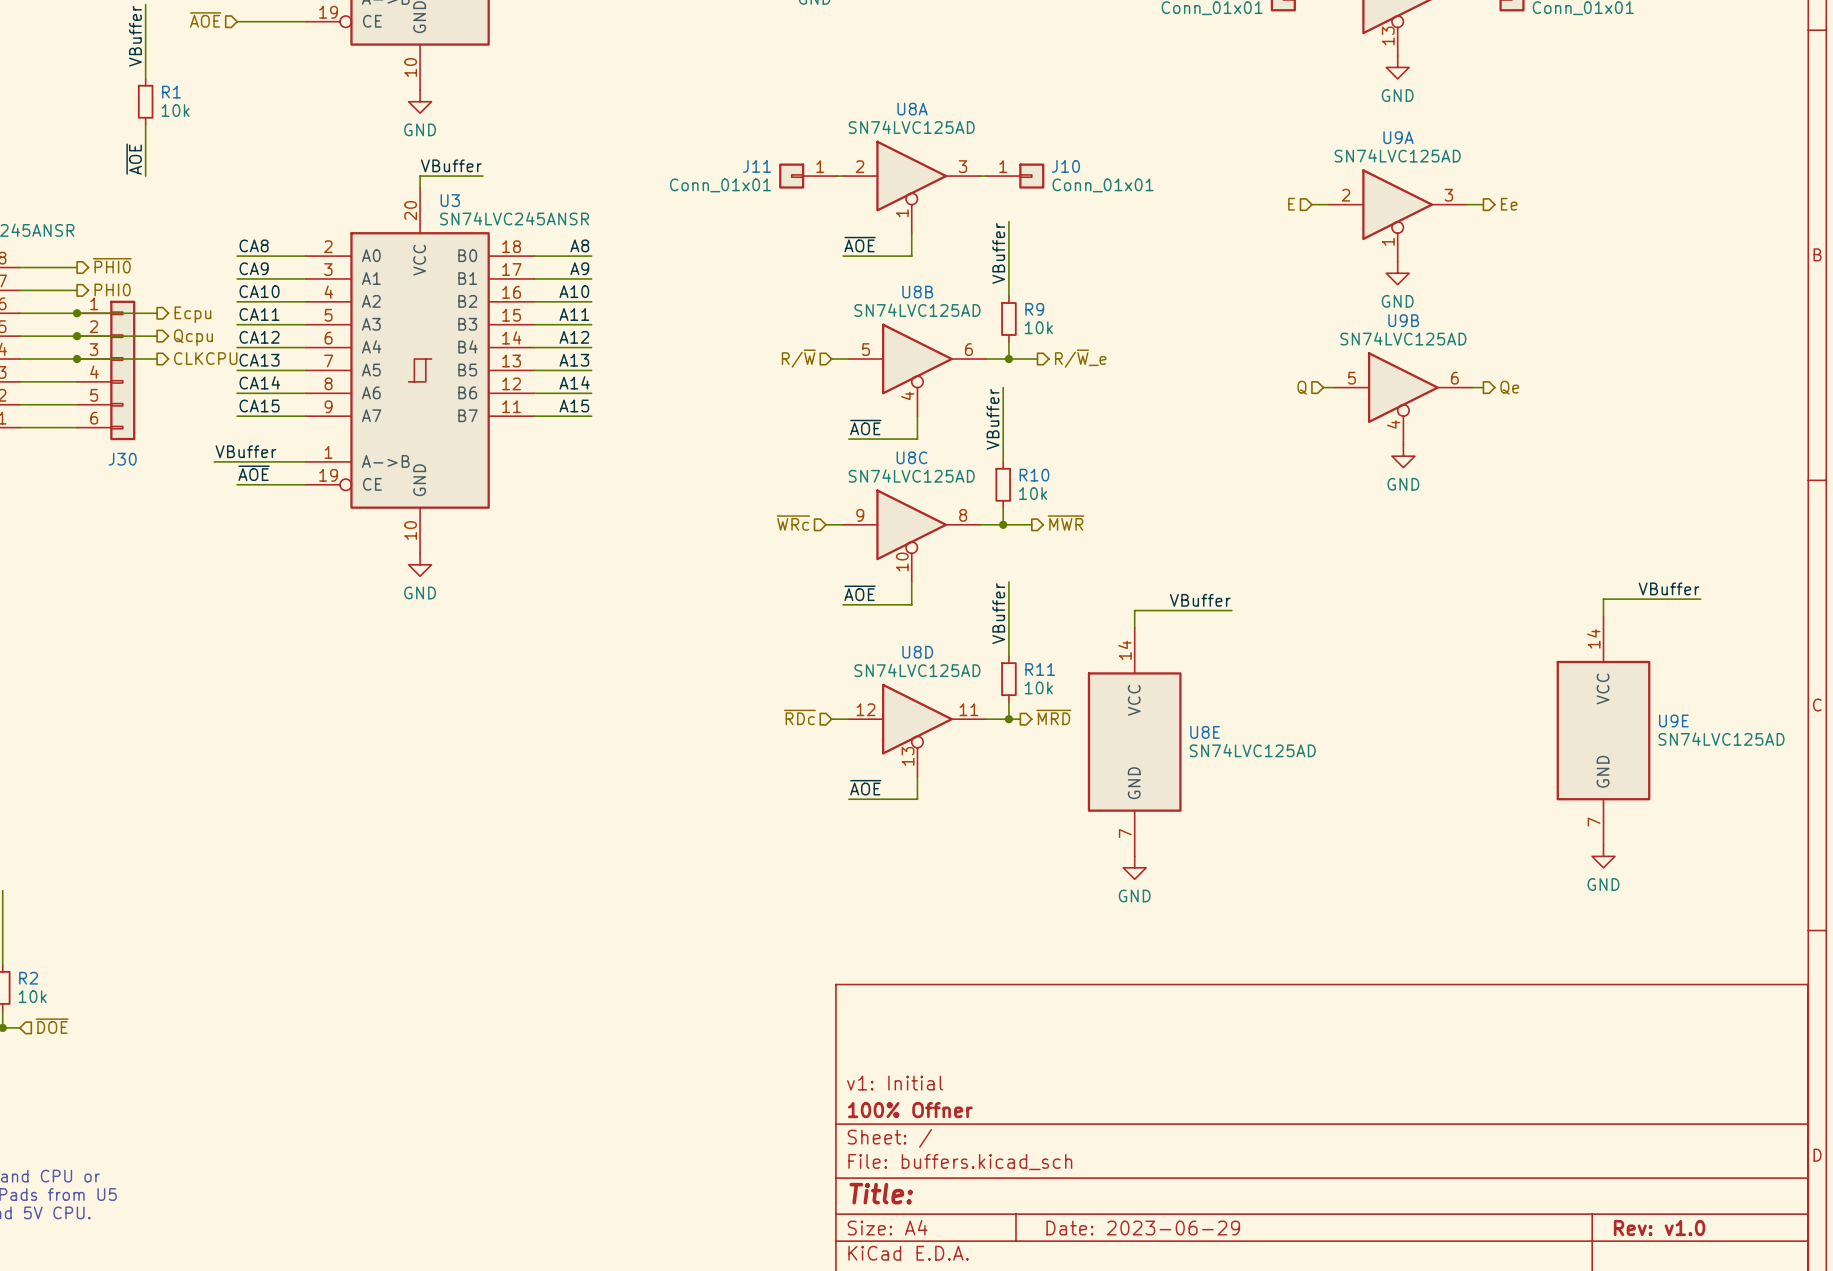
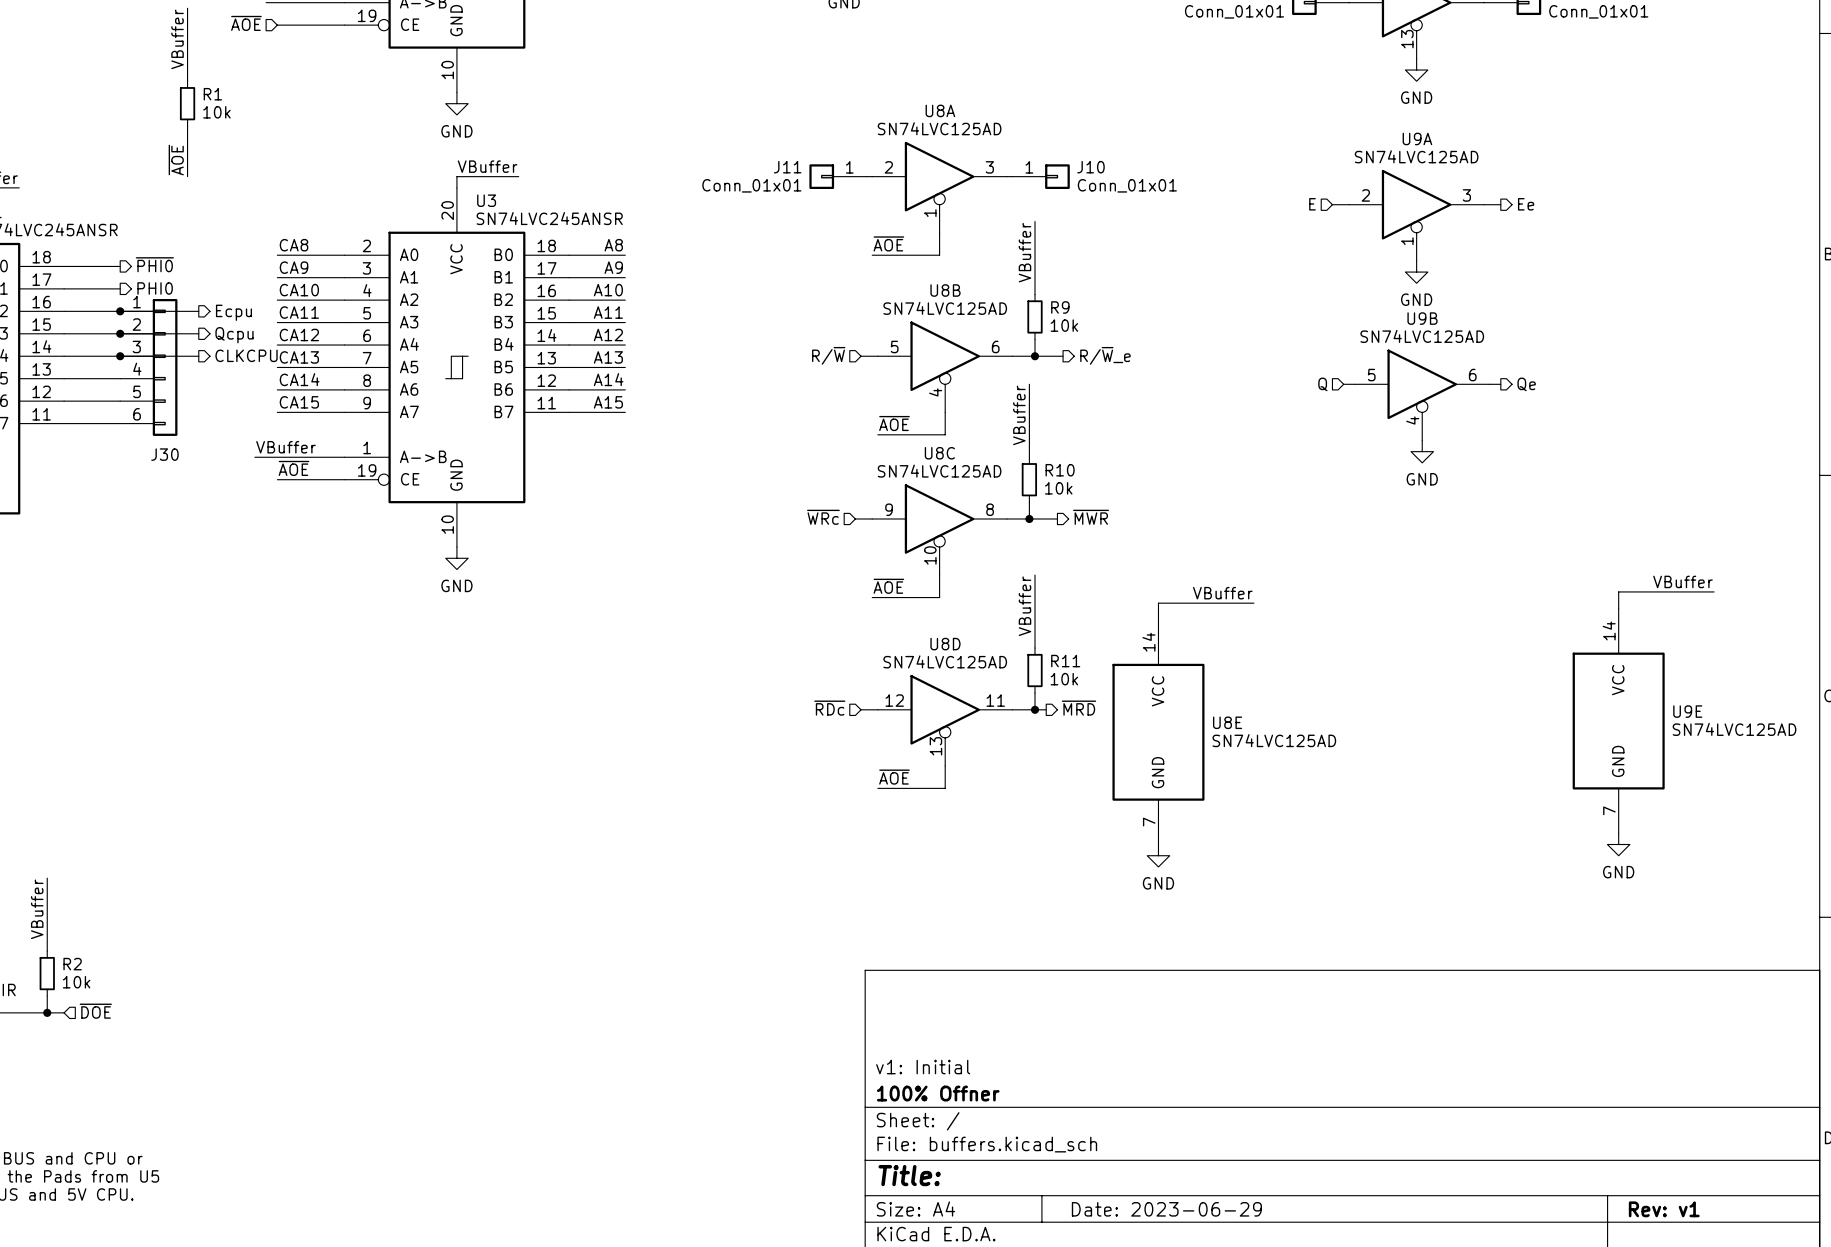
title block: Rev: v1.0 (1659, 1228) -> Rev: v1 (1664, 1209)

